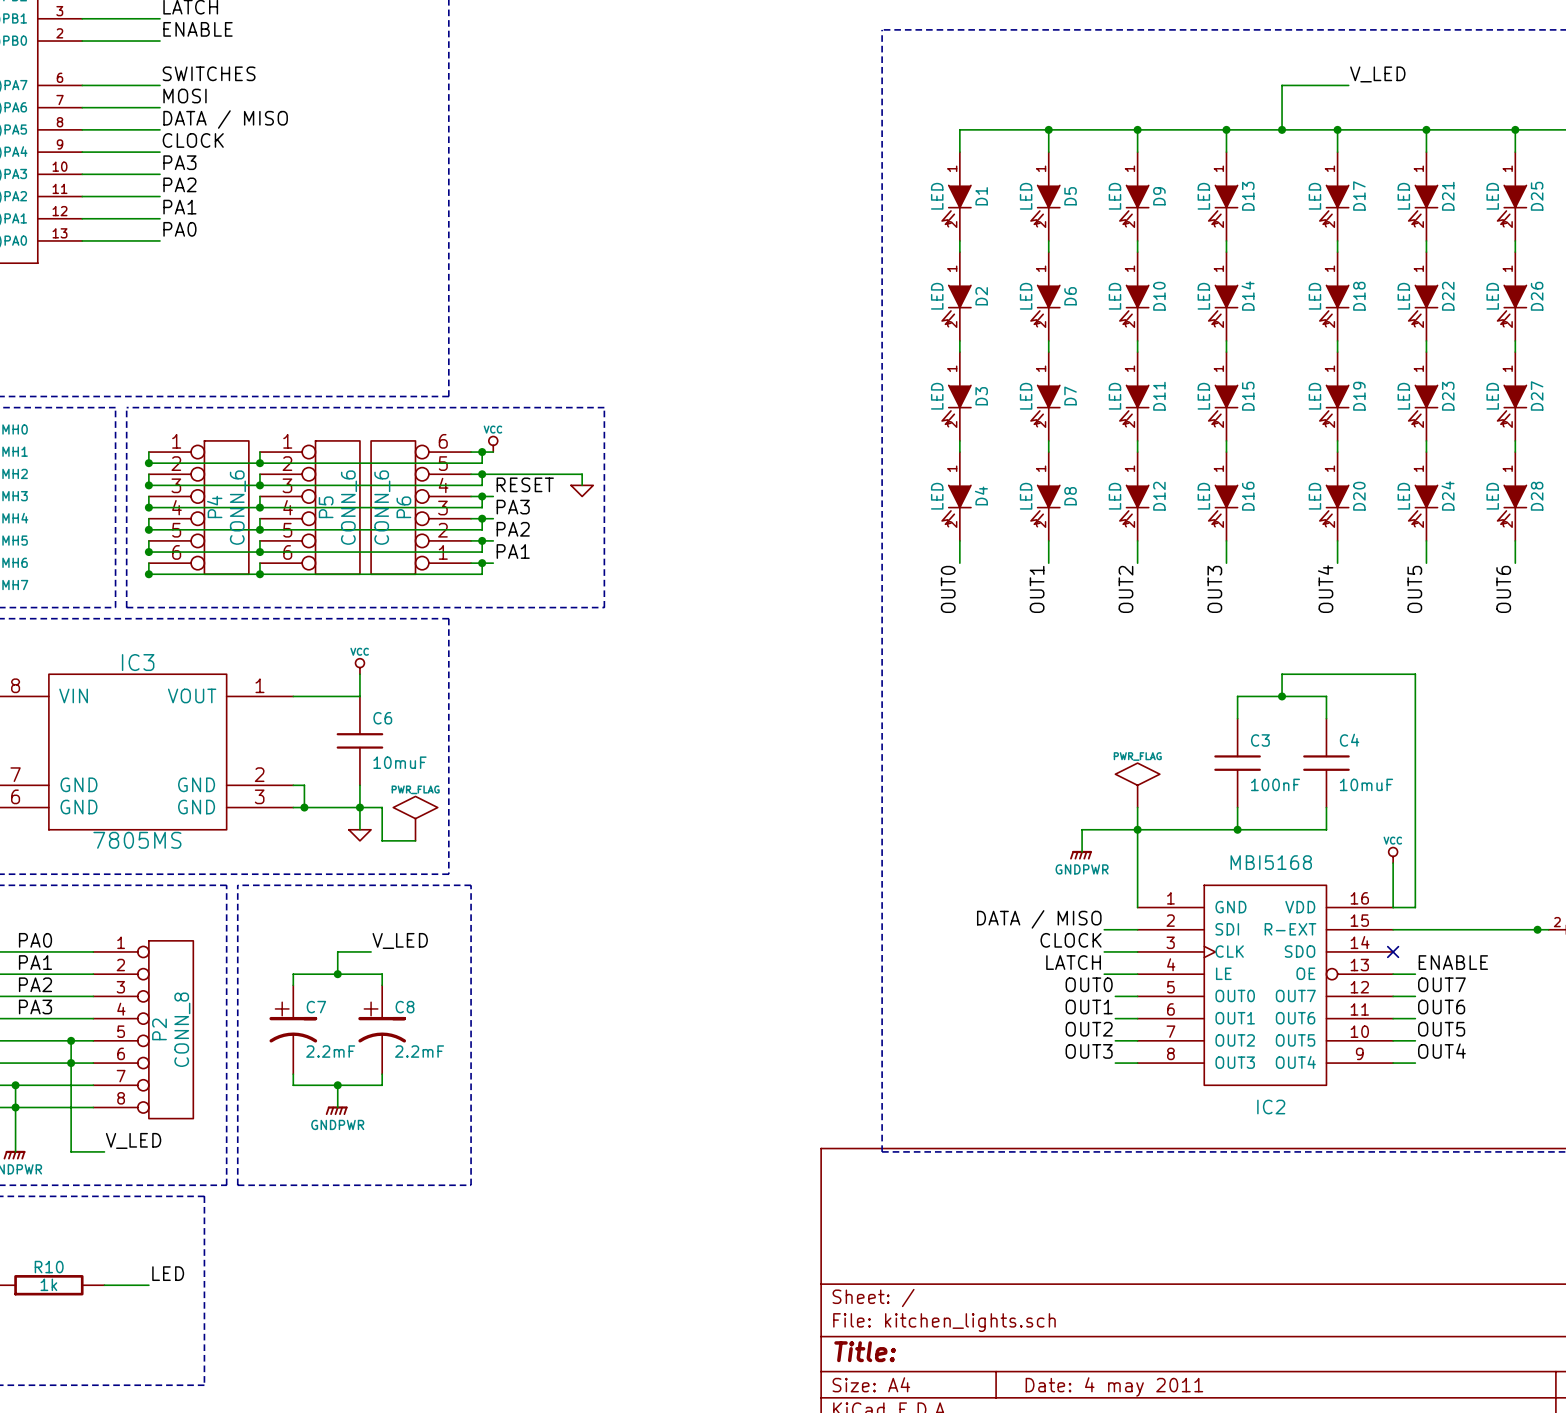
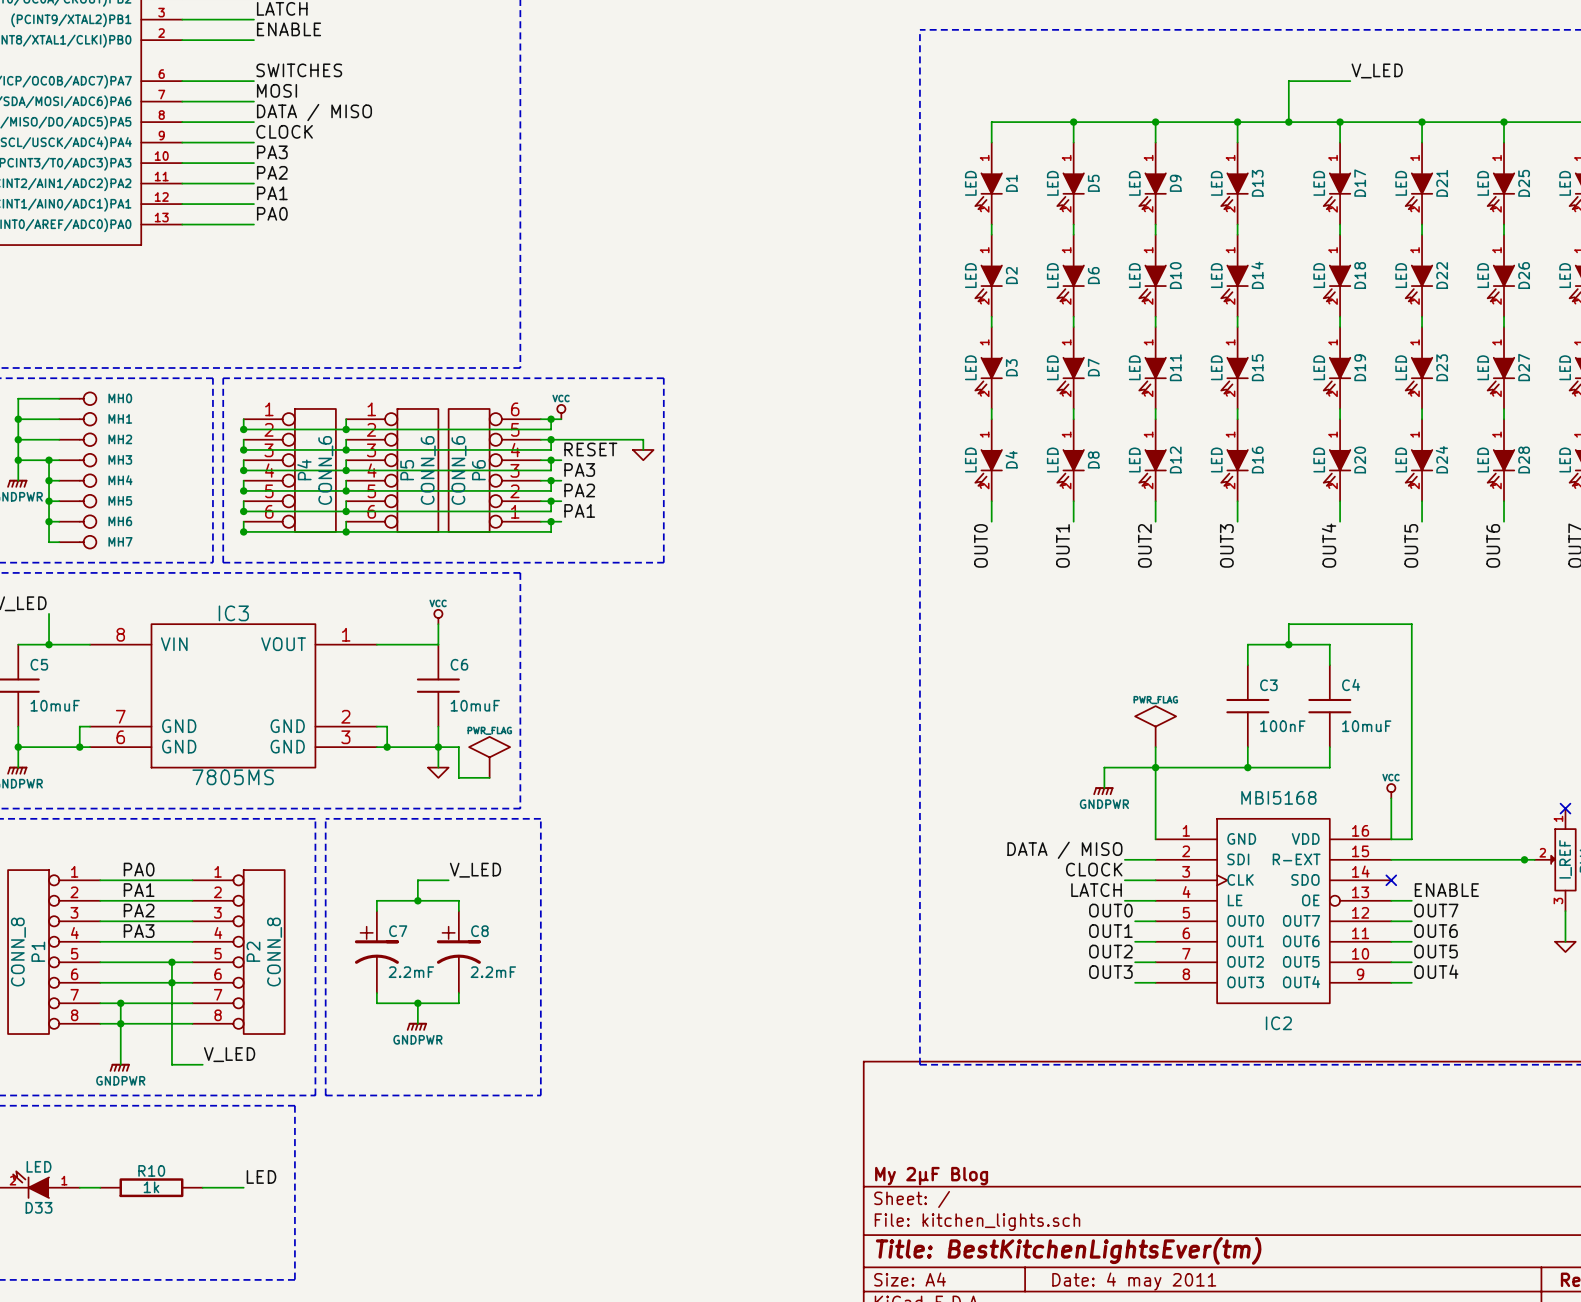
title block: none -> My 2µF Blog (931, 1176)
title block: Title: (865, 1351) -> Title: BestKitchenLightsEver(tm) (1068, 1250)

